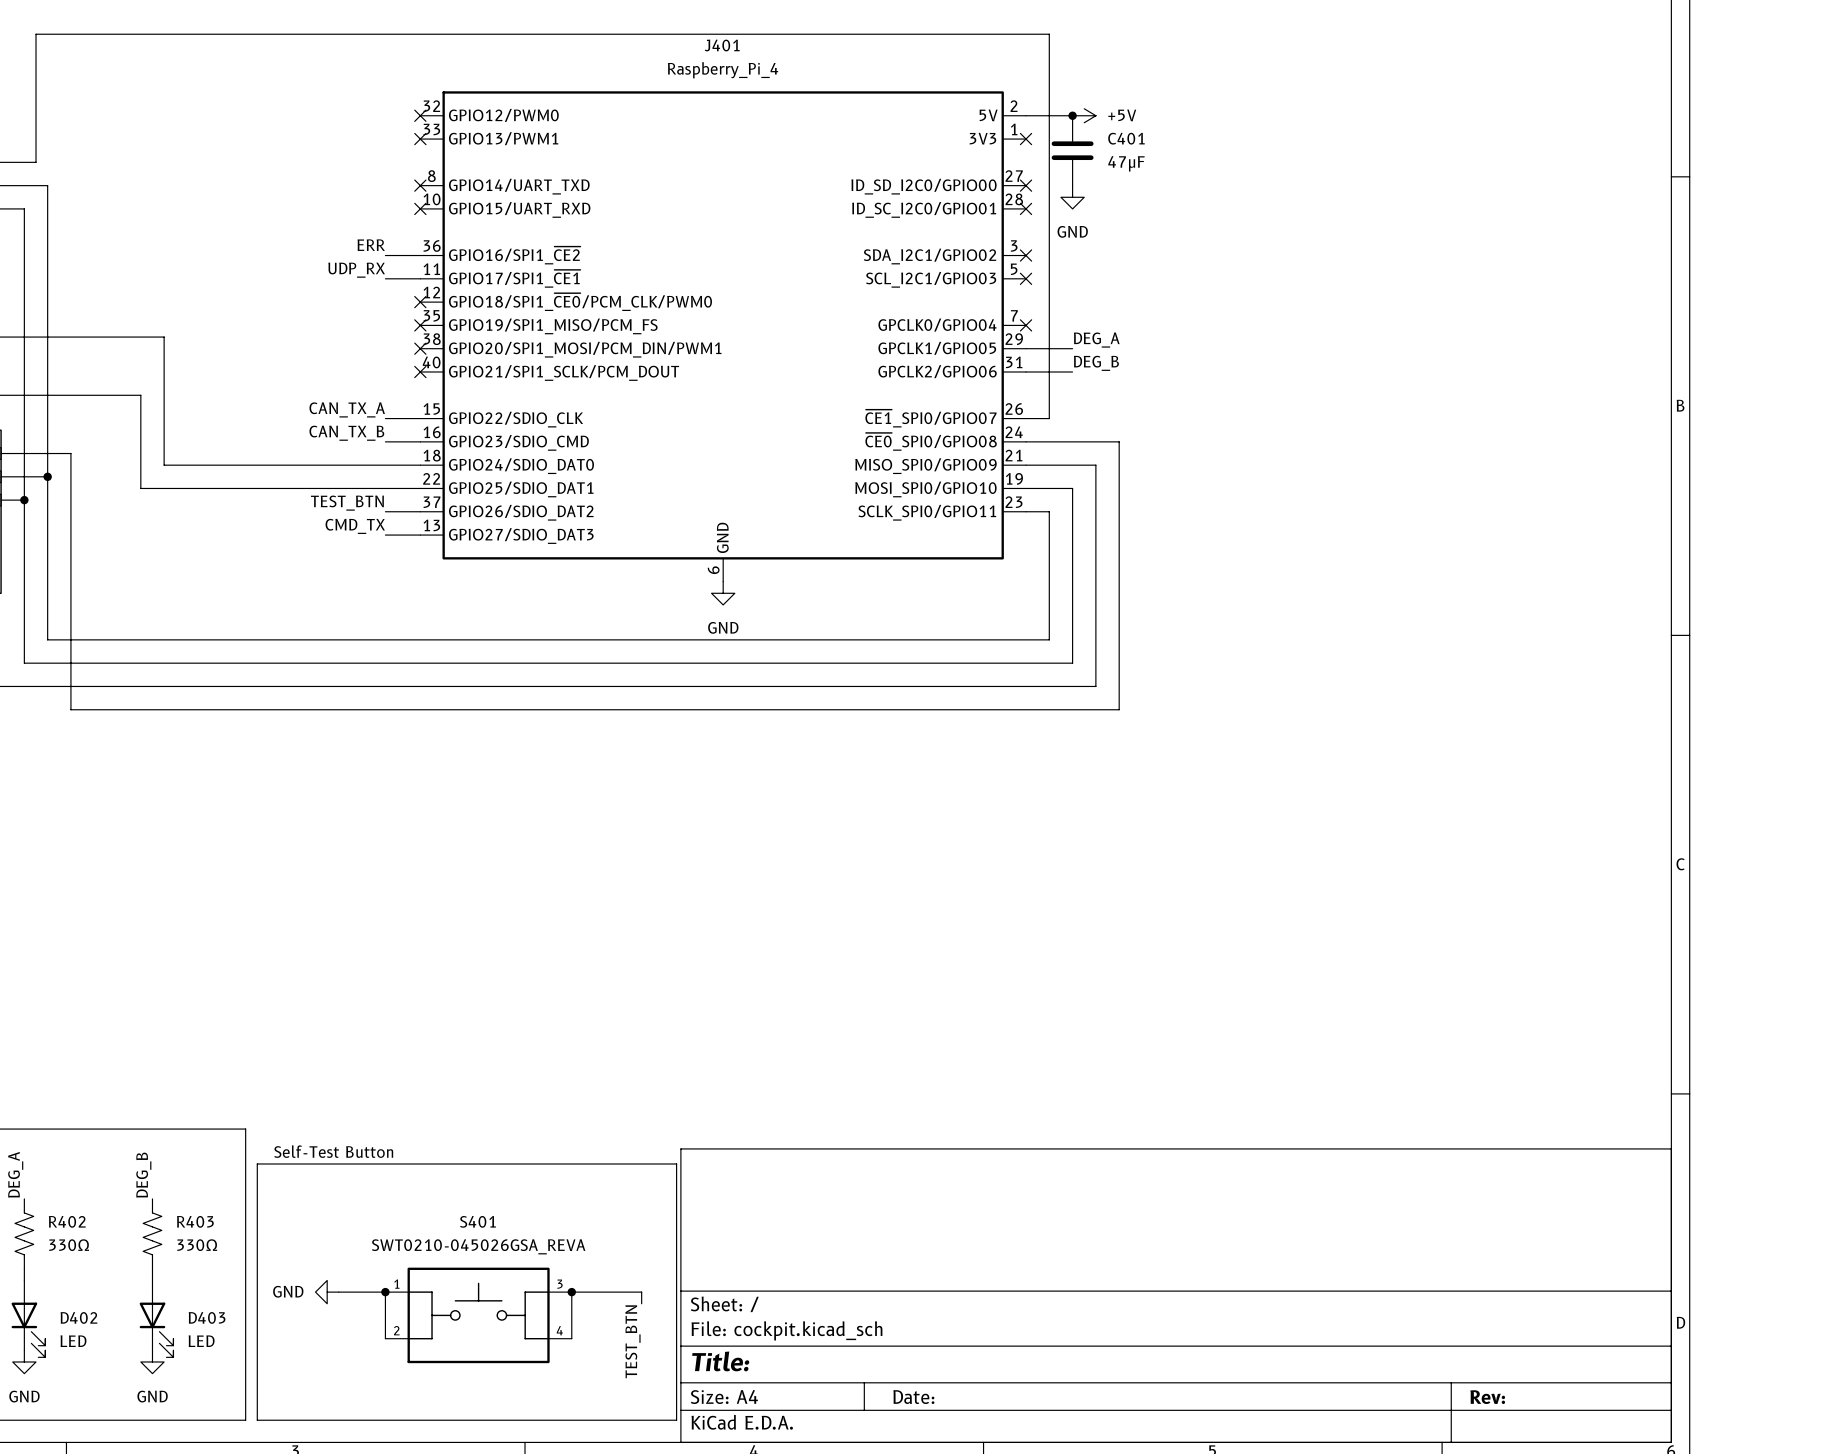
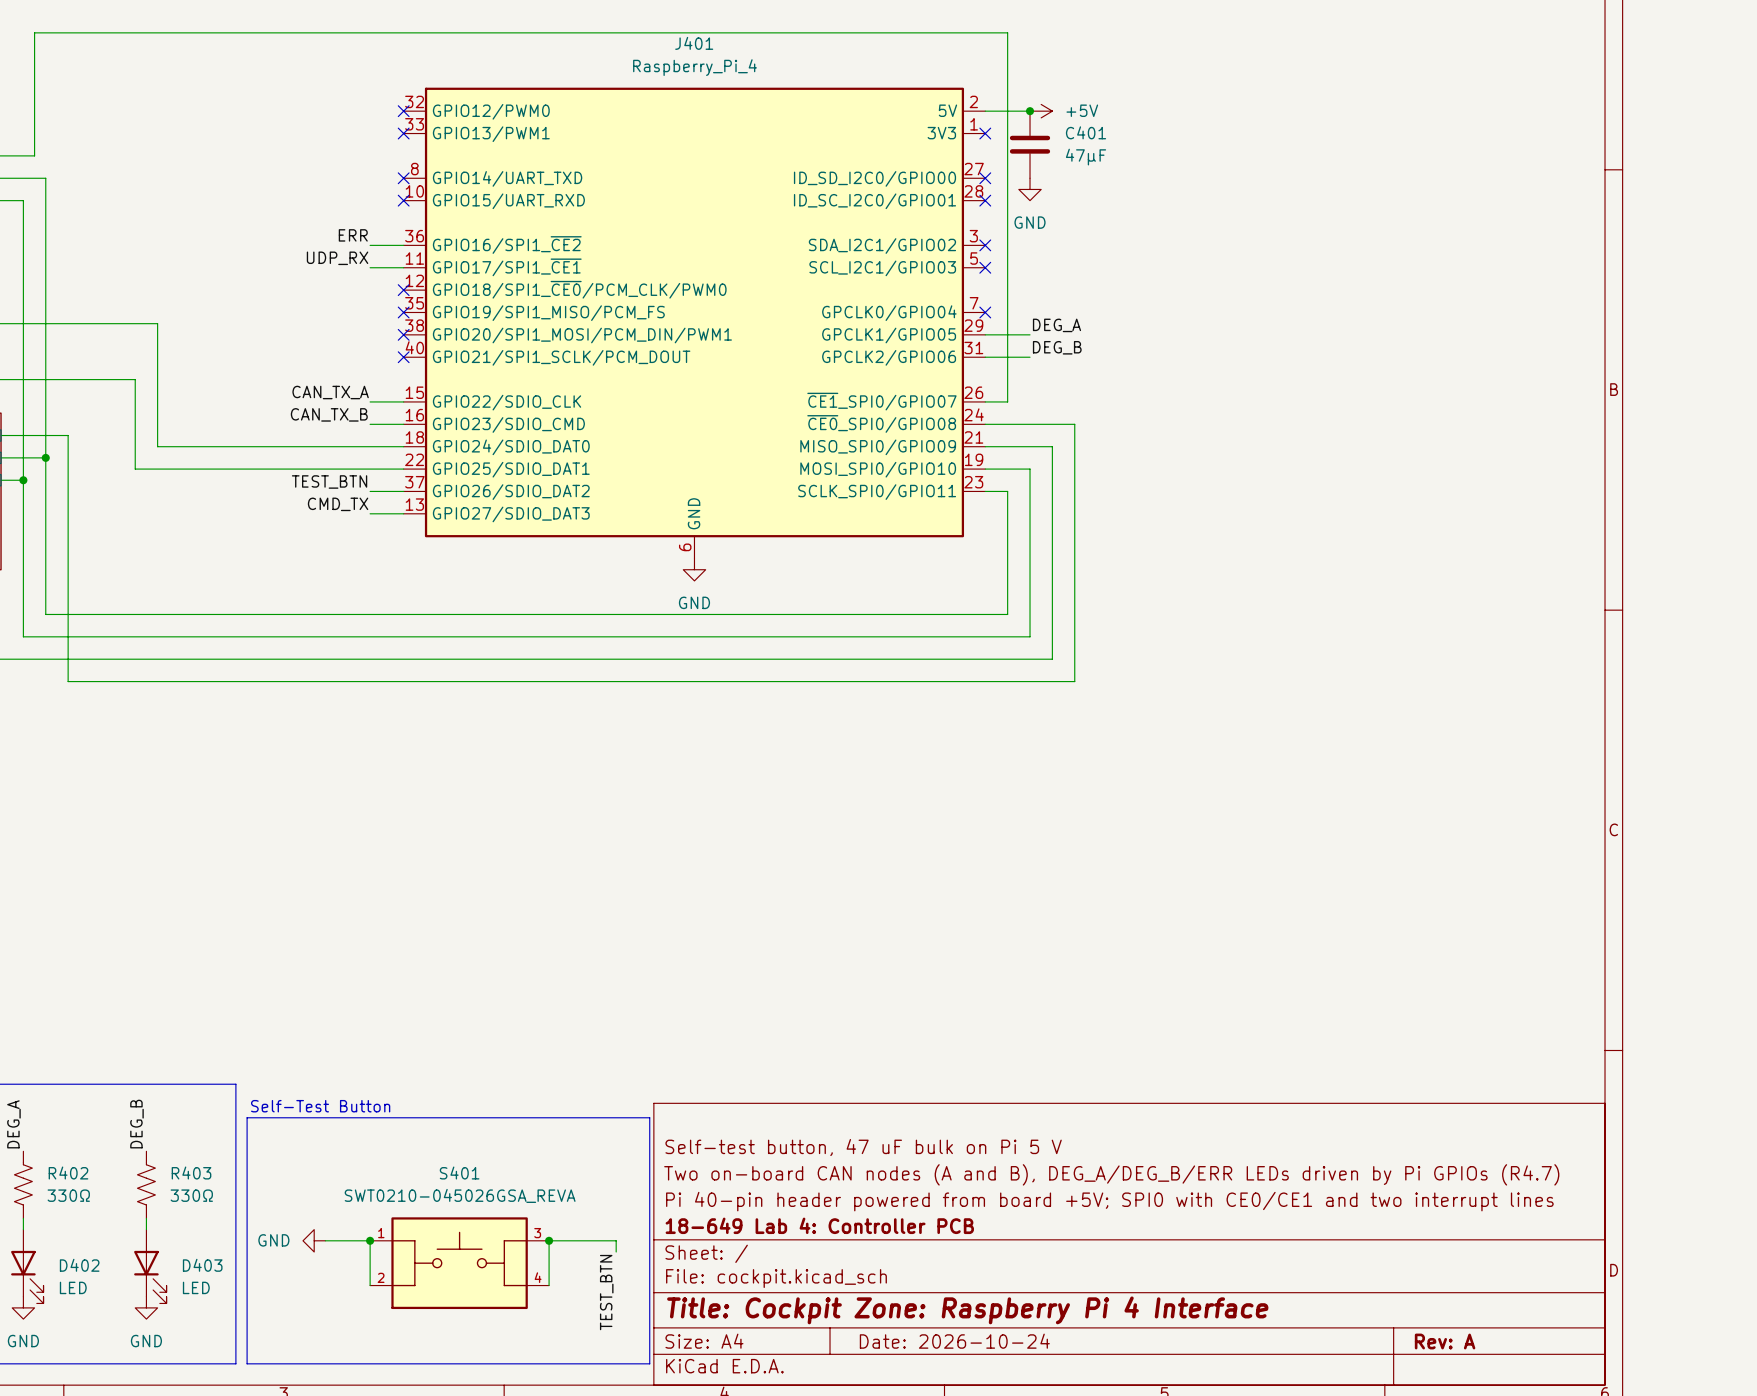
title block: none -> Self-test button, 47 uF bulk on Pi 5 V (863, 1147)
title block: none -> Two on-board CAN nodes (A and B), DEG_A/DEG_B/ERR LEDs driven by Pi GPIOs (R4.7) (1111, 1174)
title block: none -> Pi 40-pin header powered from board +5V; SPI0 with CE0/CE1 and two interrupt lines (1109, 1201)
title block: none -> 18-649 Lab 4: Controller PCB (819, 1225)
title block: Title: (720, 1361) -> Title: Cockpit Zone: Raspberry Pi 4 Interface (967, 1310)
title block: Date: (913, 1397) -> Date: 2026-10-24 (954, 1341)
title block: Rev: (1487, 1397) -> Rev: A (1445, 1341)

